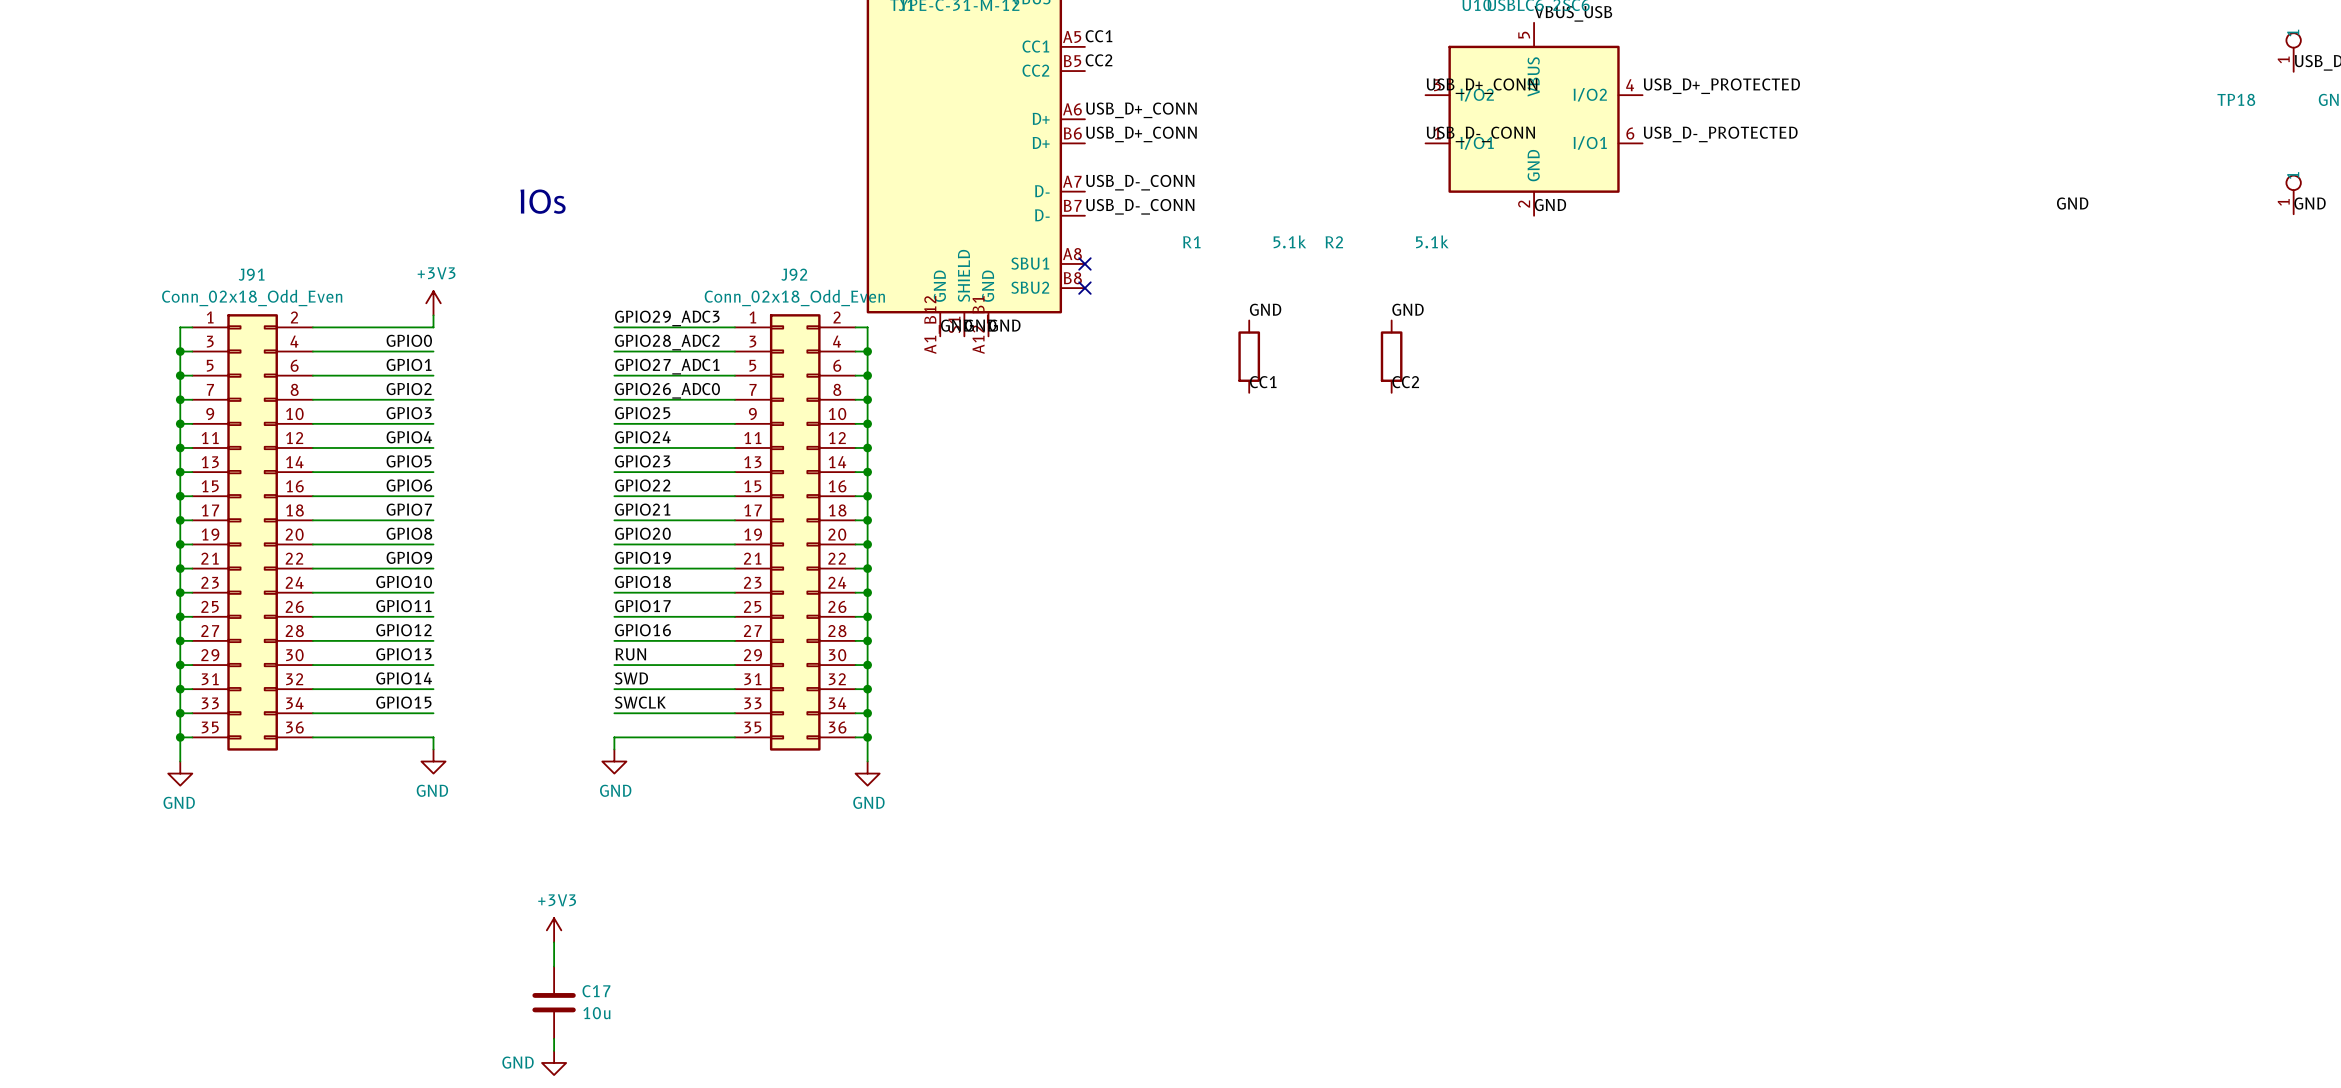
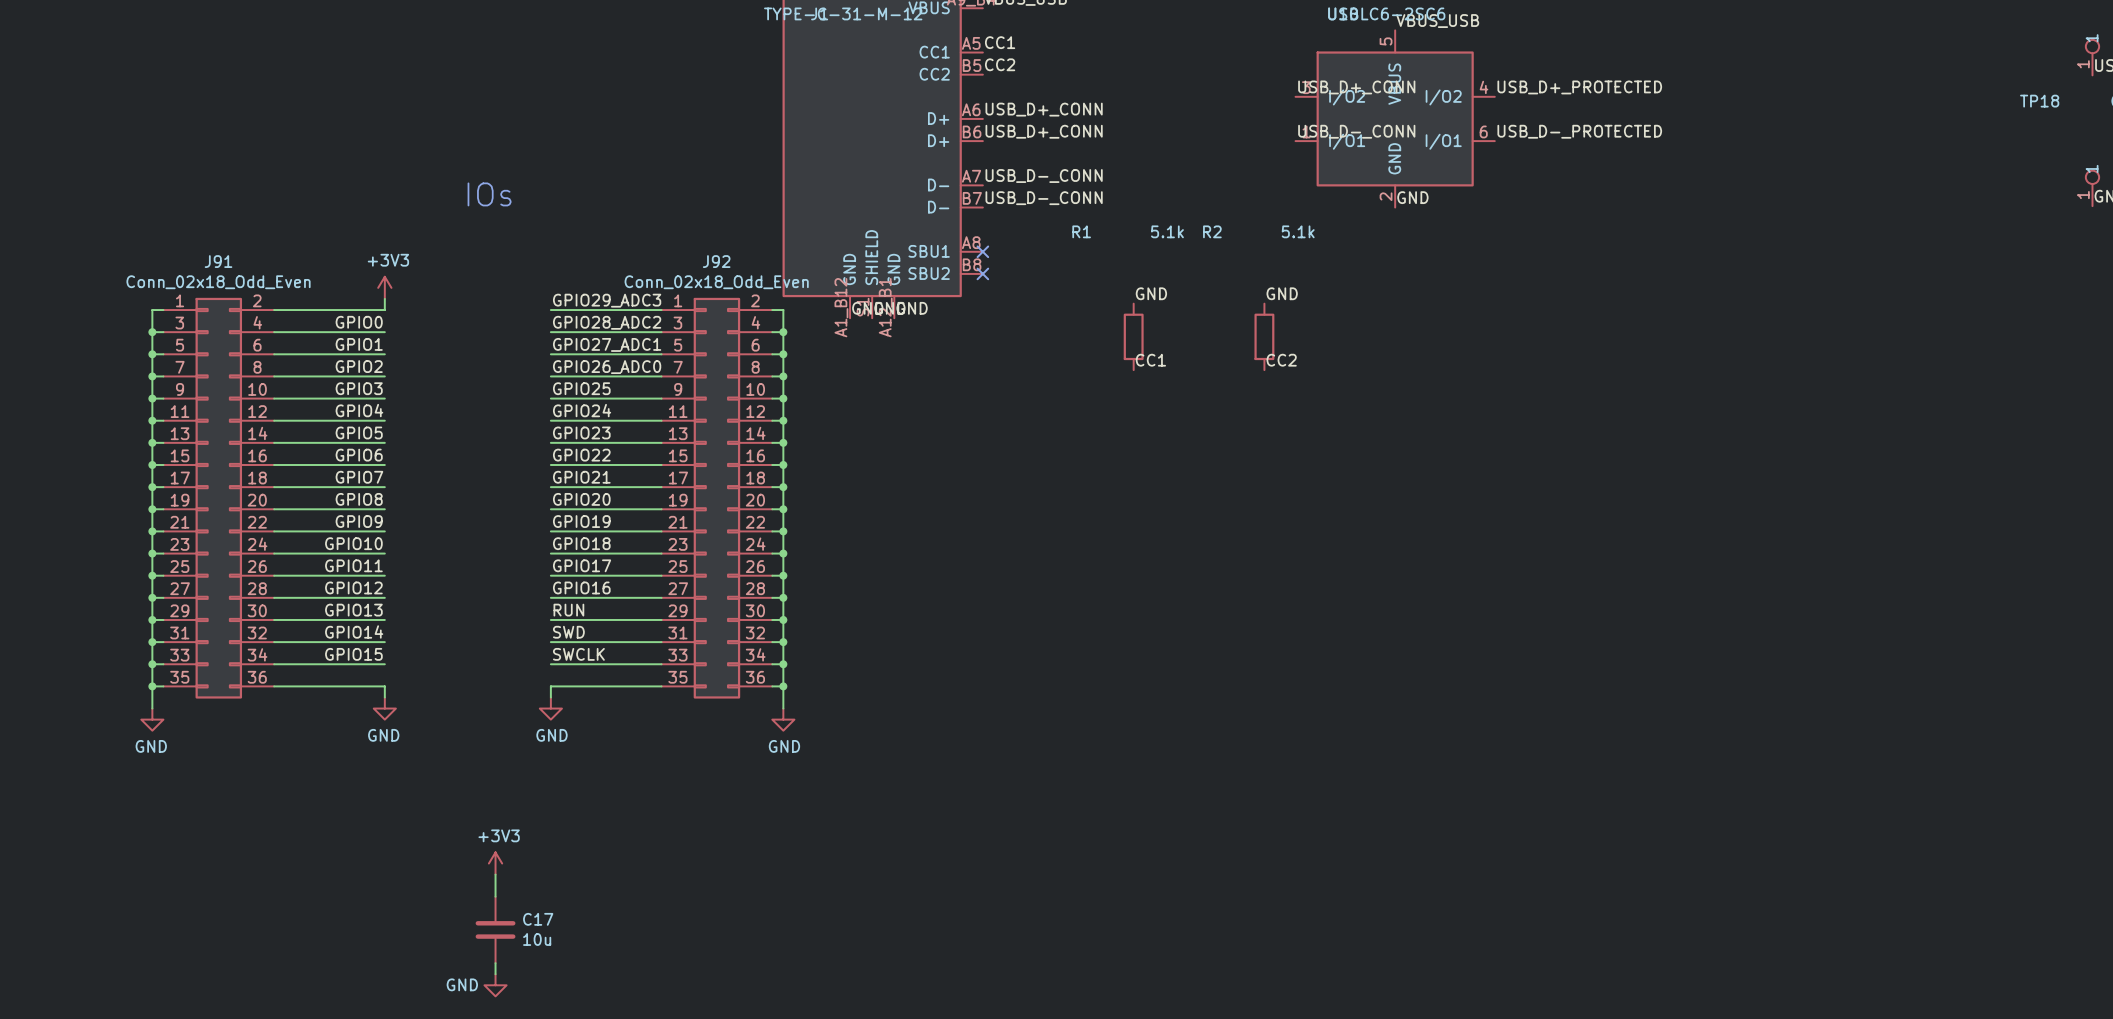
label: GND (2072, 203) -> none

